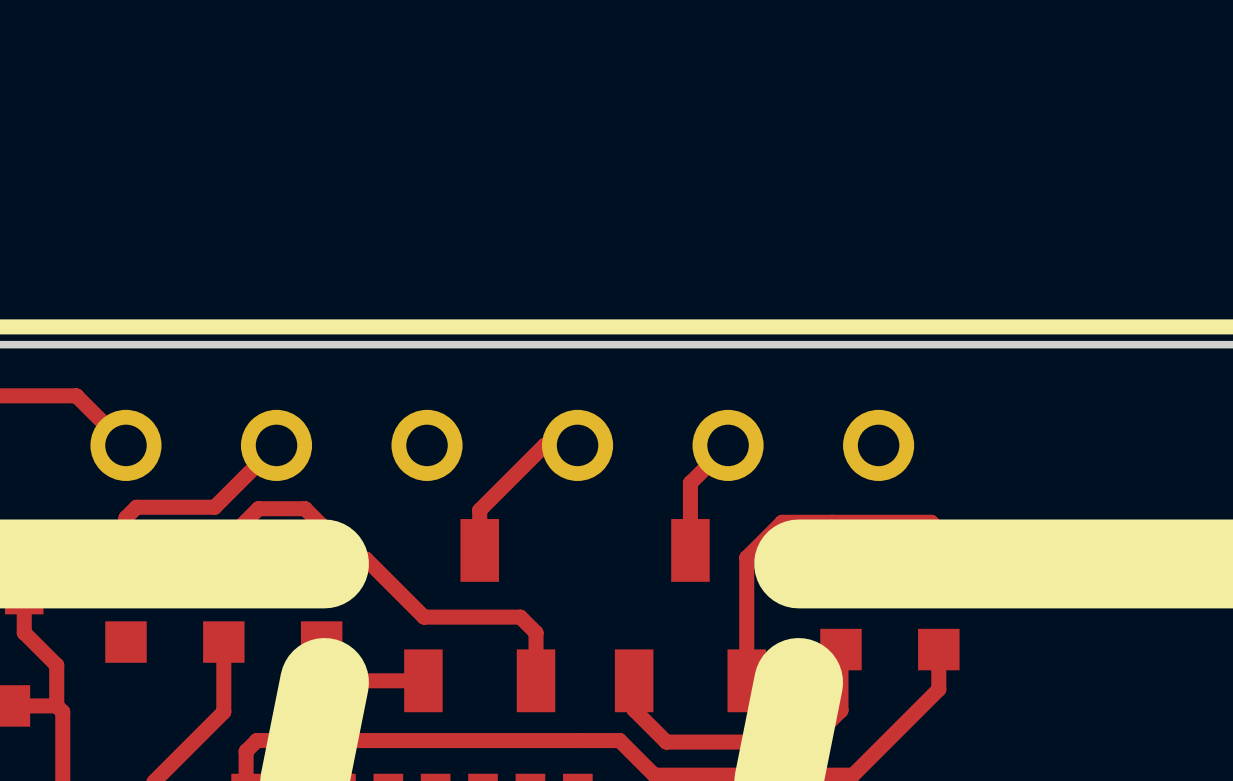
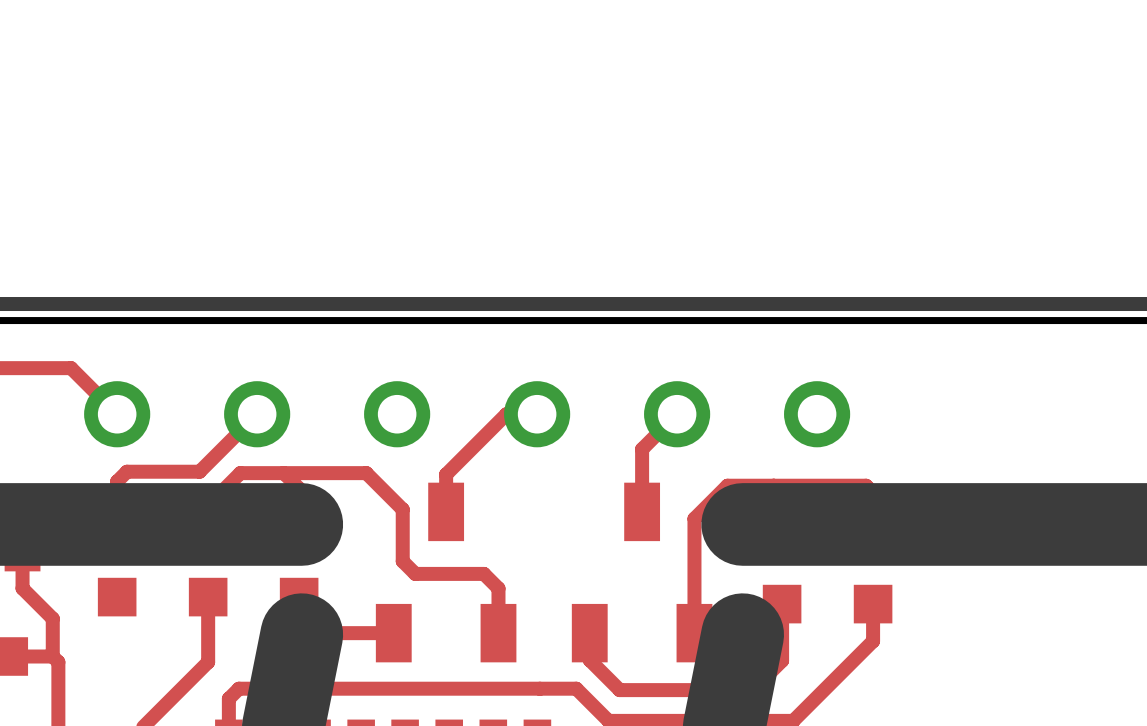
top track: (321, 559) (365, 559) (424, 617) (446, 617) -> (283, 473) (366, 473) (402, 509) (402, 561) (415, 573)

